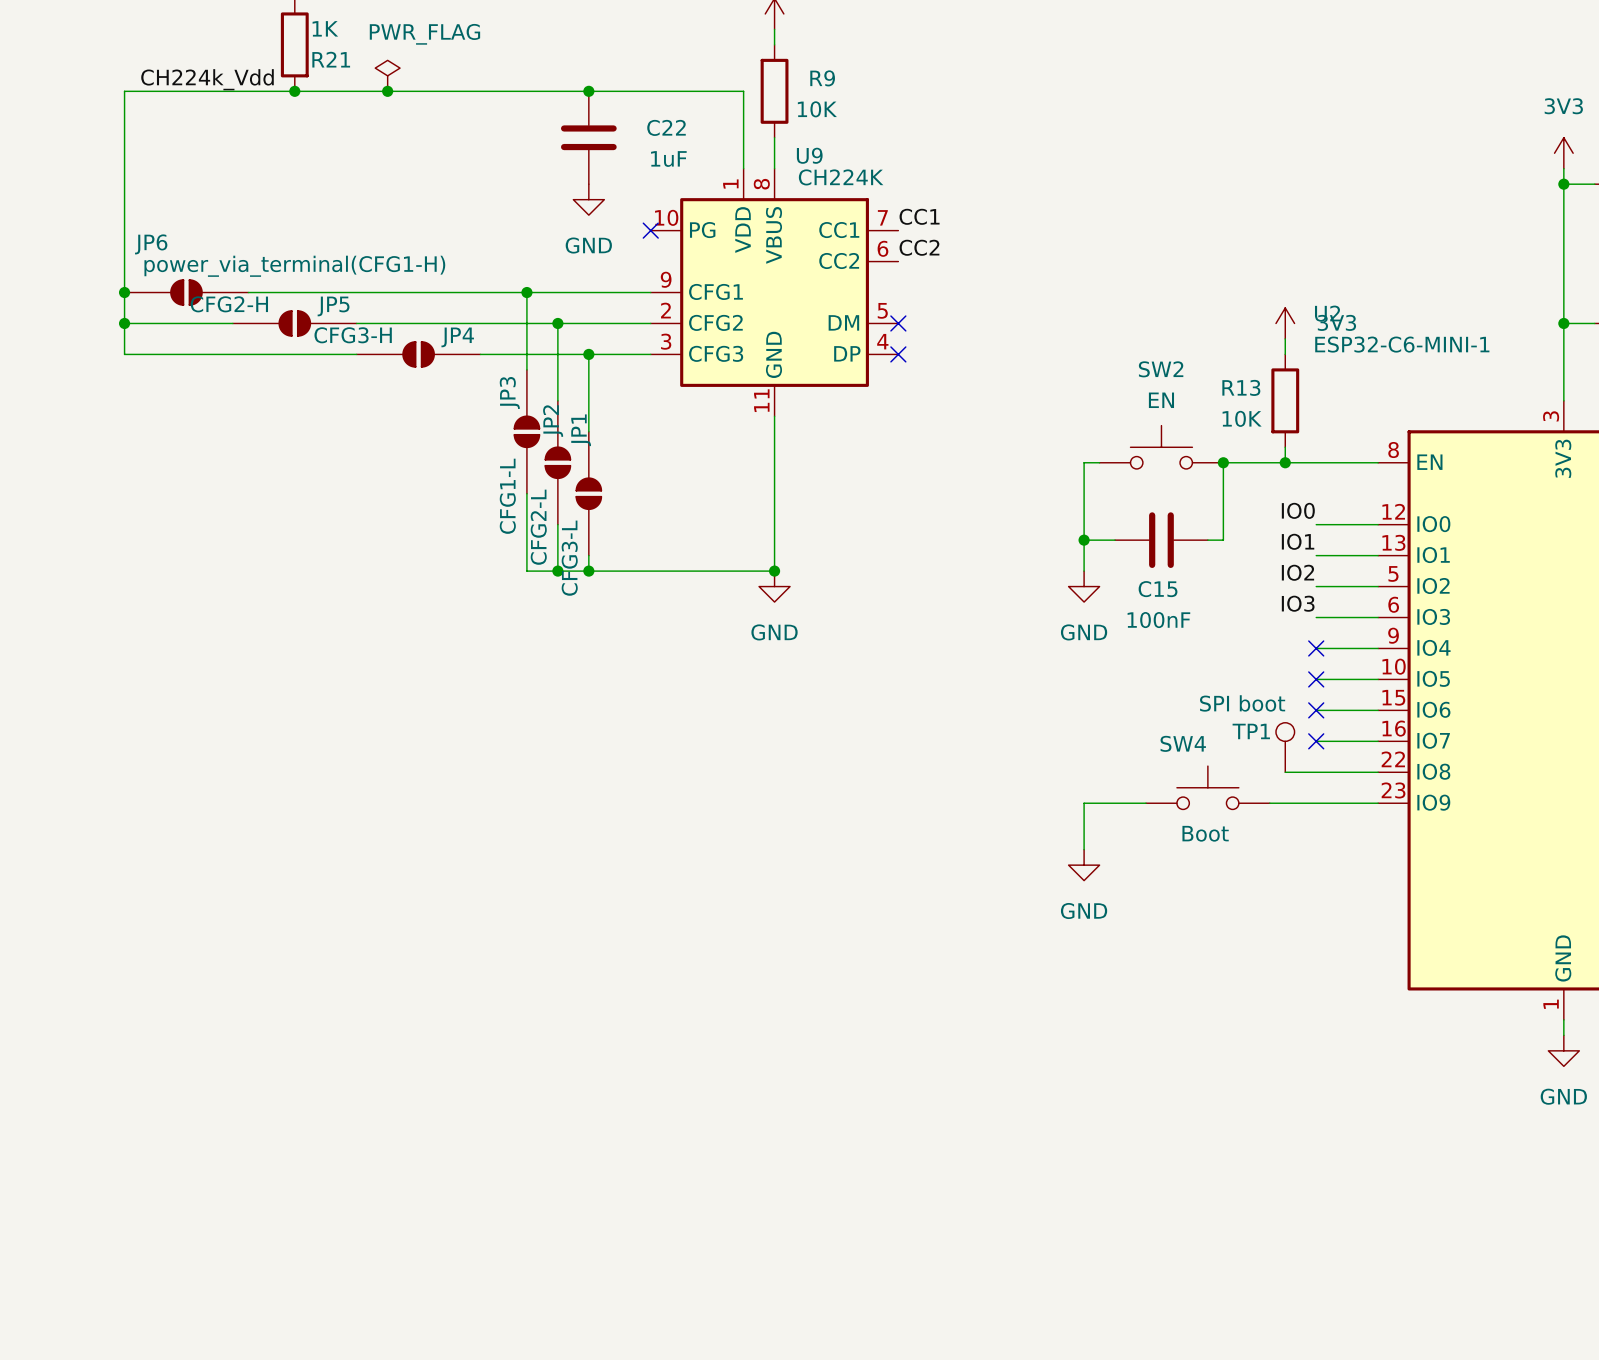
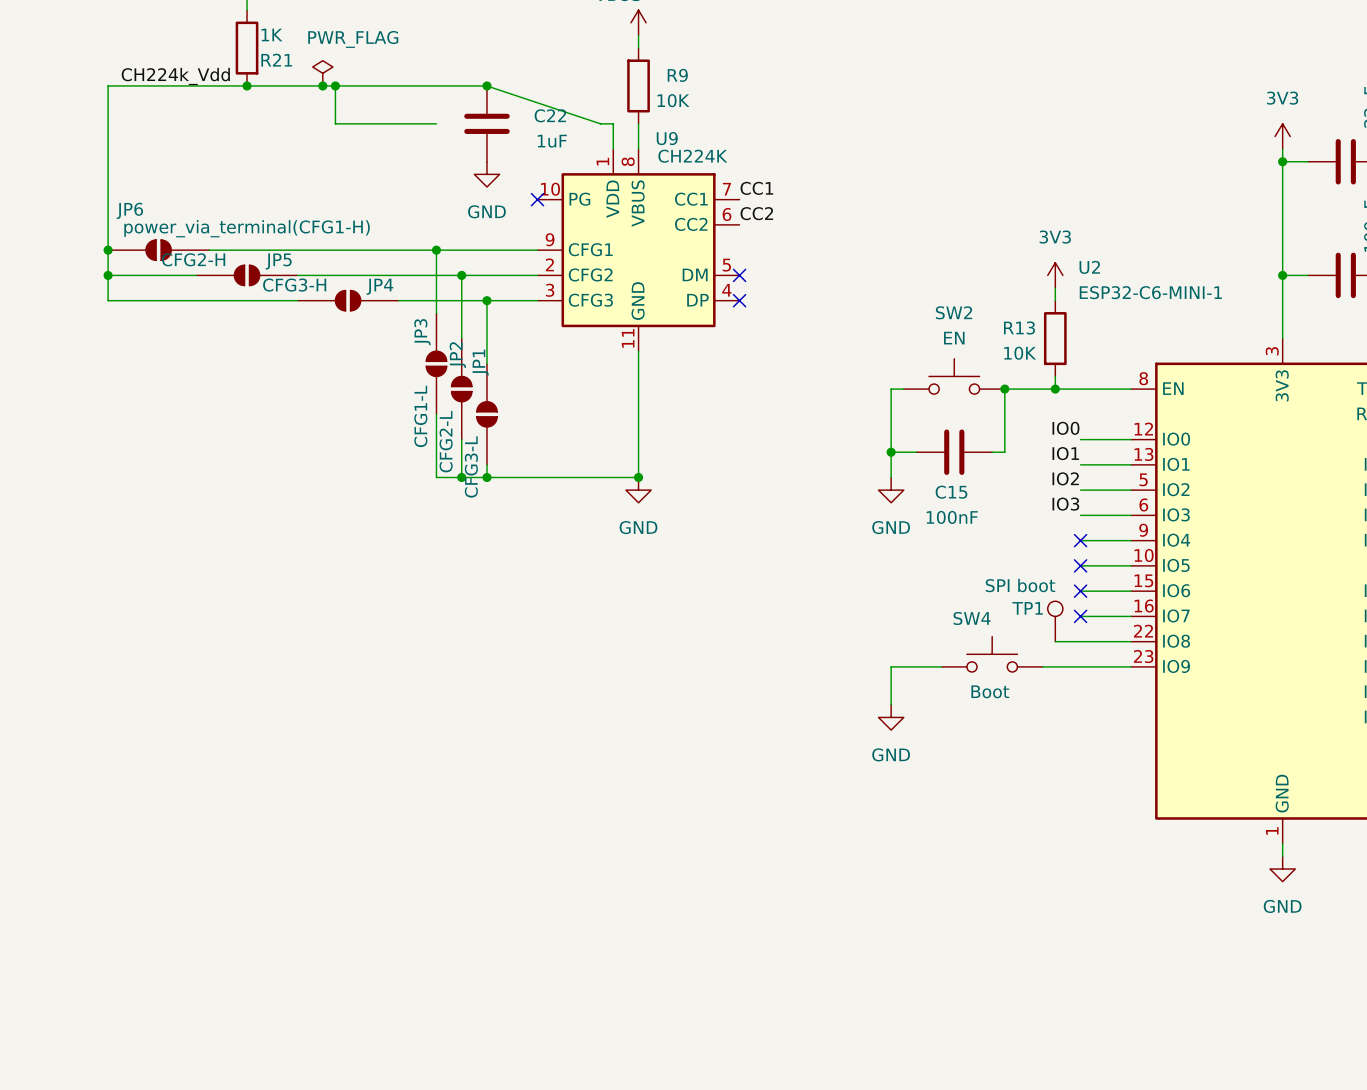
wire: none -> (335, 85) (335, 123) (436, 123)
junction: none -> (335, 85)
wire: (588, 91) (743, 91) (743, 137) -> (486, 85) (600, 123) (613, 123)
power symbol text position: 3V3 (1336, 322) -> 3V3 (1055, 237)

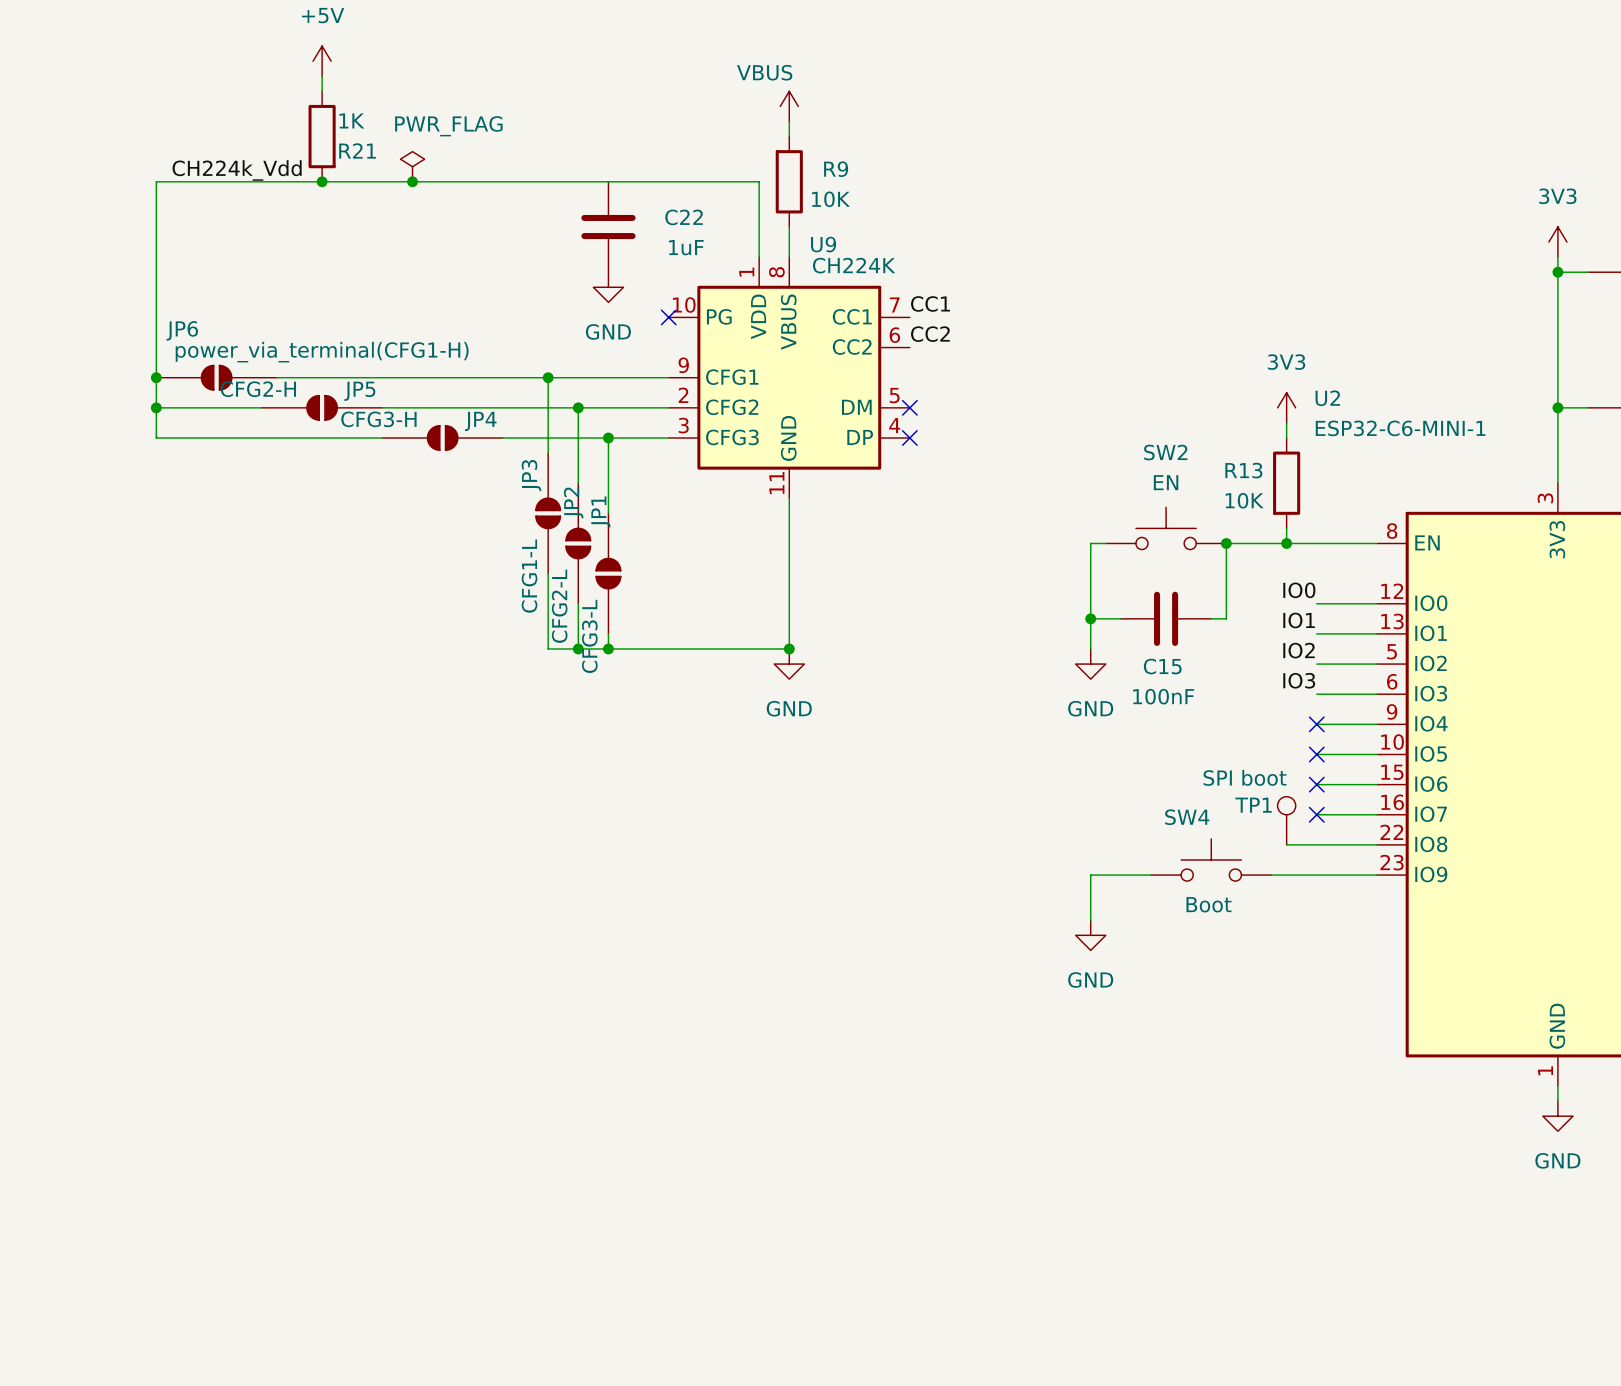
wire: (335, 85) (335, 123) (436, 123) -> none
junction: (335, 85) -> none
wire: (486, 85) (600, 123) (613, 123) -> (608, 181) (759, 181) (759, 227)
junction: (486, 85) -> none

